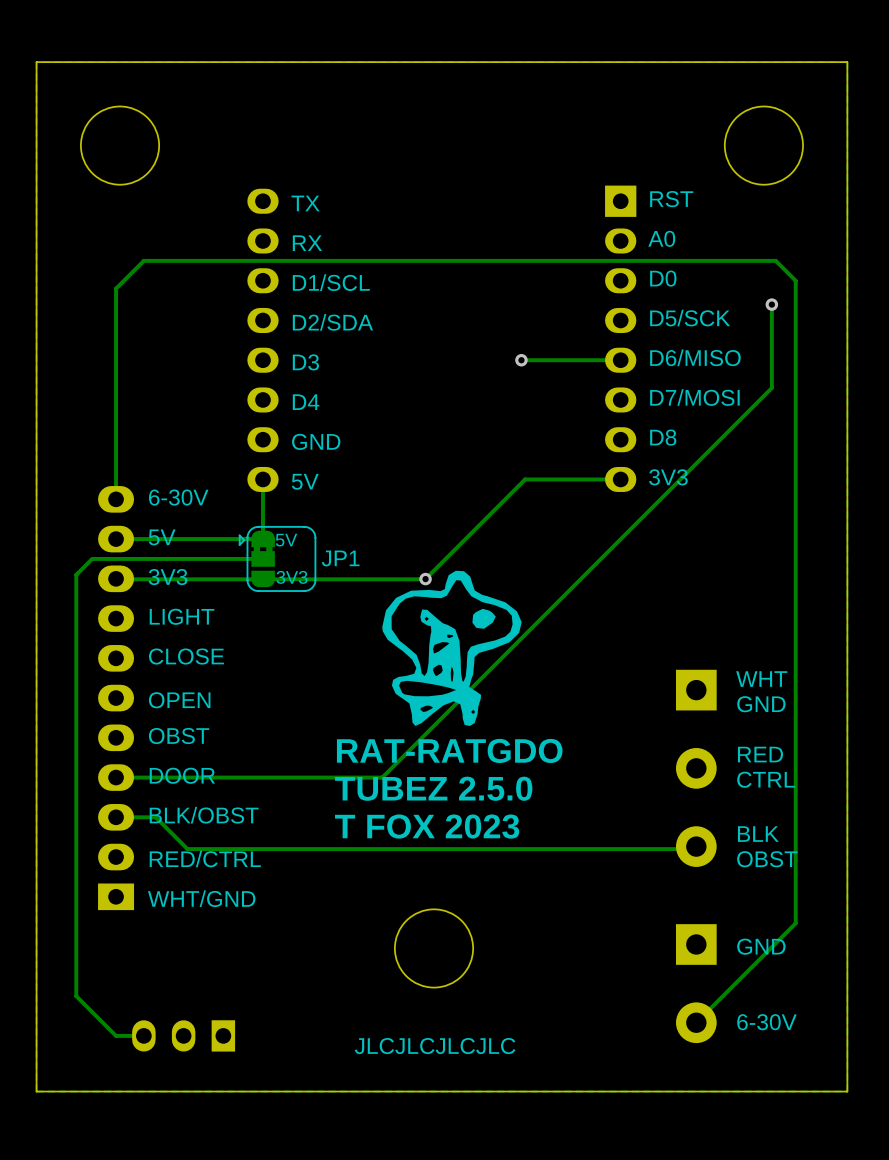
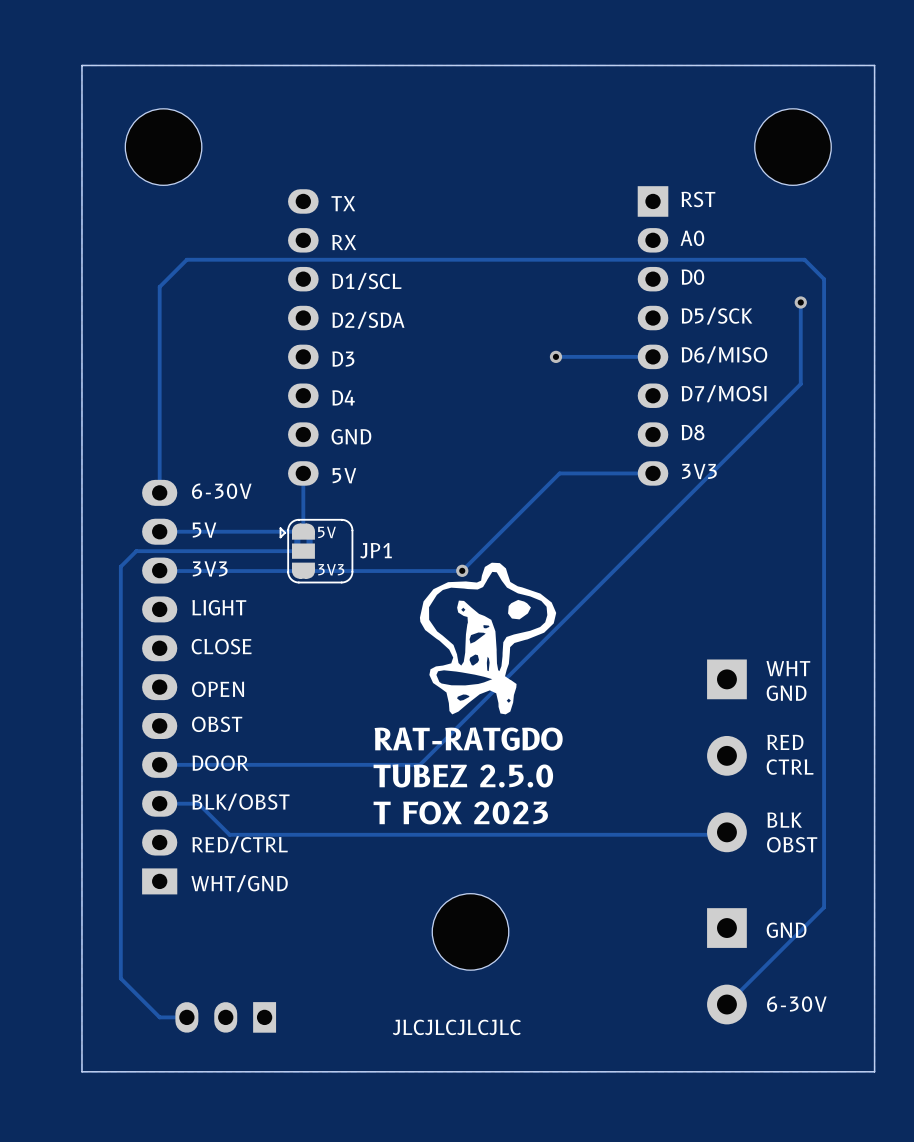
JP1 footprint: [238, 525, 317, 592] -> [279, 518, 354, 584]

